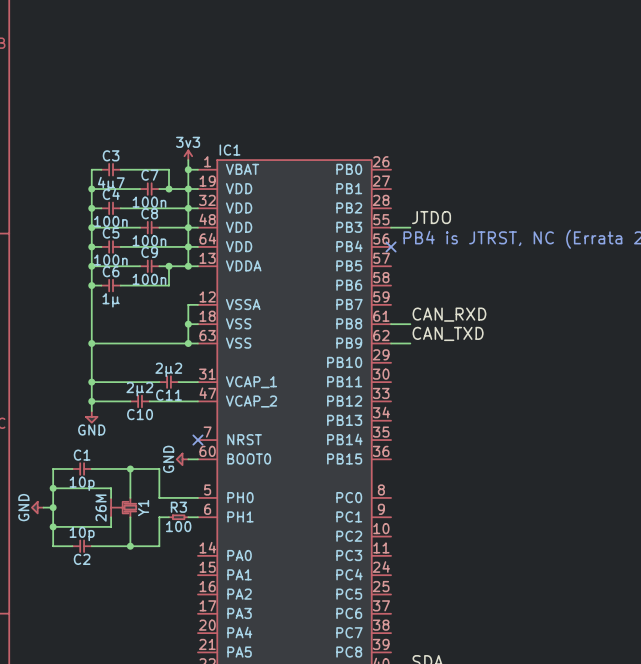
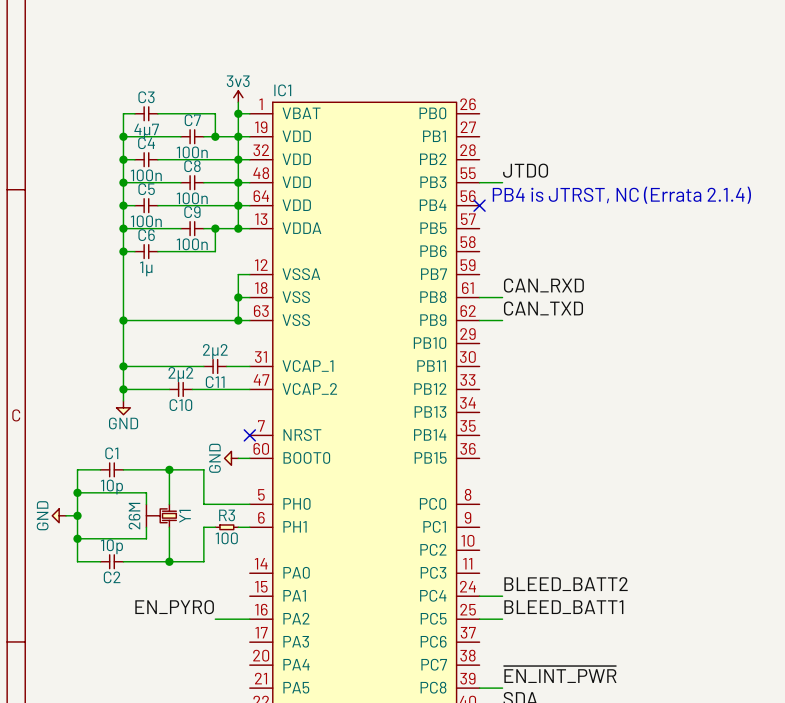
label: none -> BLEED_BATT2 (566, 584)
wire: none -> (479, 596) (502, 596)
label: none -> EN_PYRO (174, 607)
label: none -> BLEED_BATT1 (563, 607)
wire: none -> (215, 619) (249, 619)
wire: none -> (479, 619) (502, 619)
label: none -> ~{EN_INT_PWR} (560, 674)
wire: none -> (479, 688) (502, 688)

